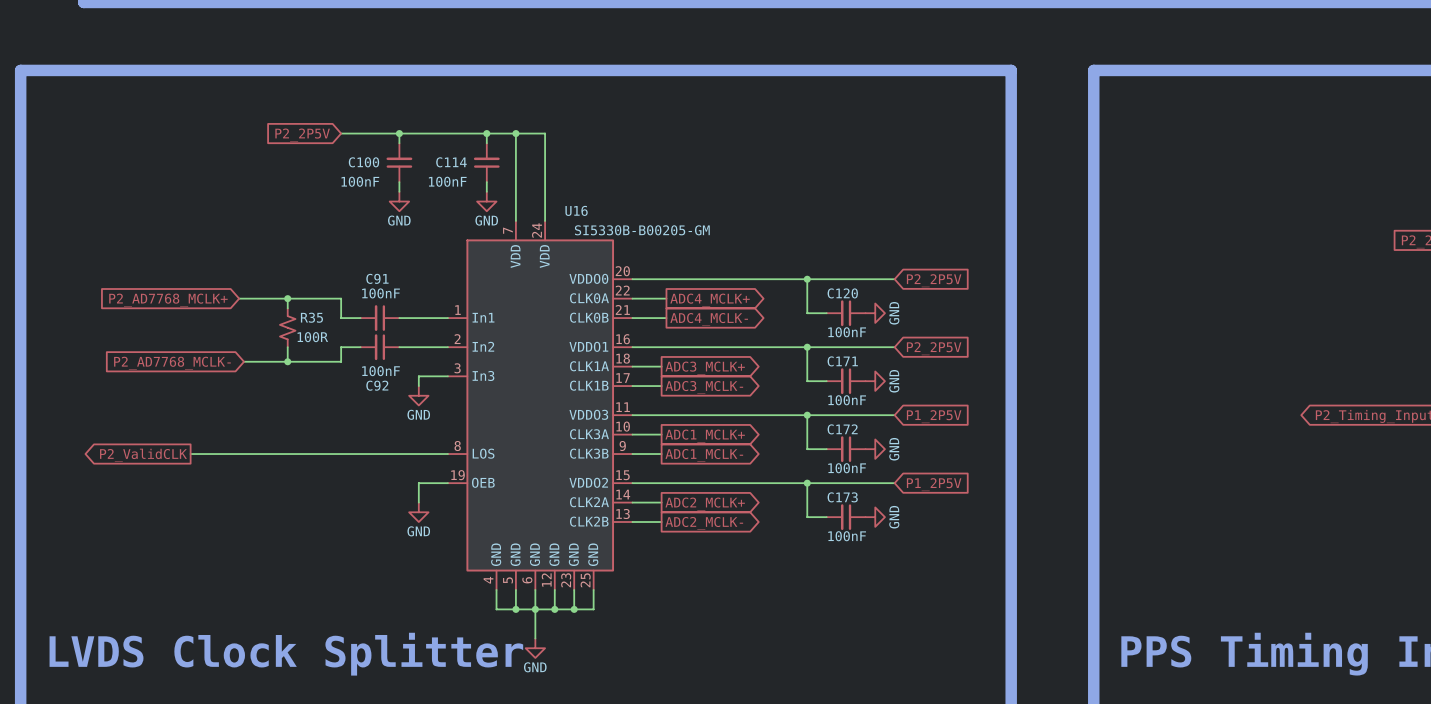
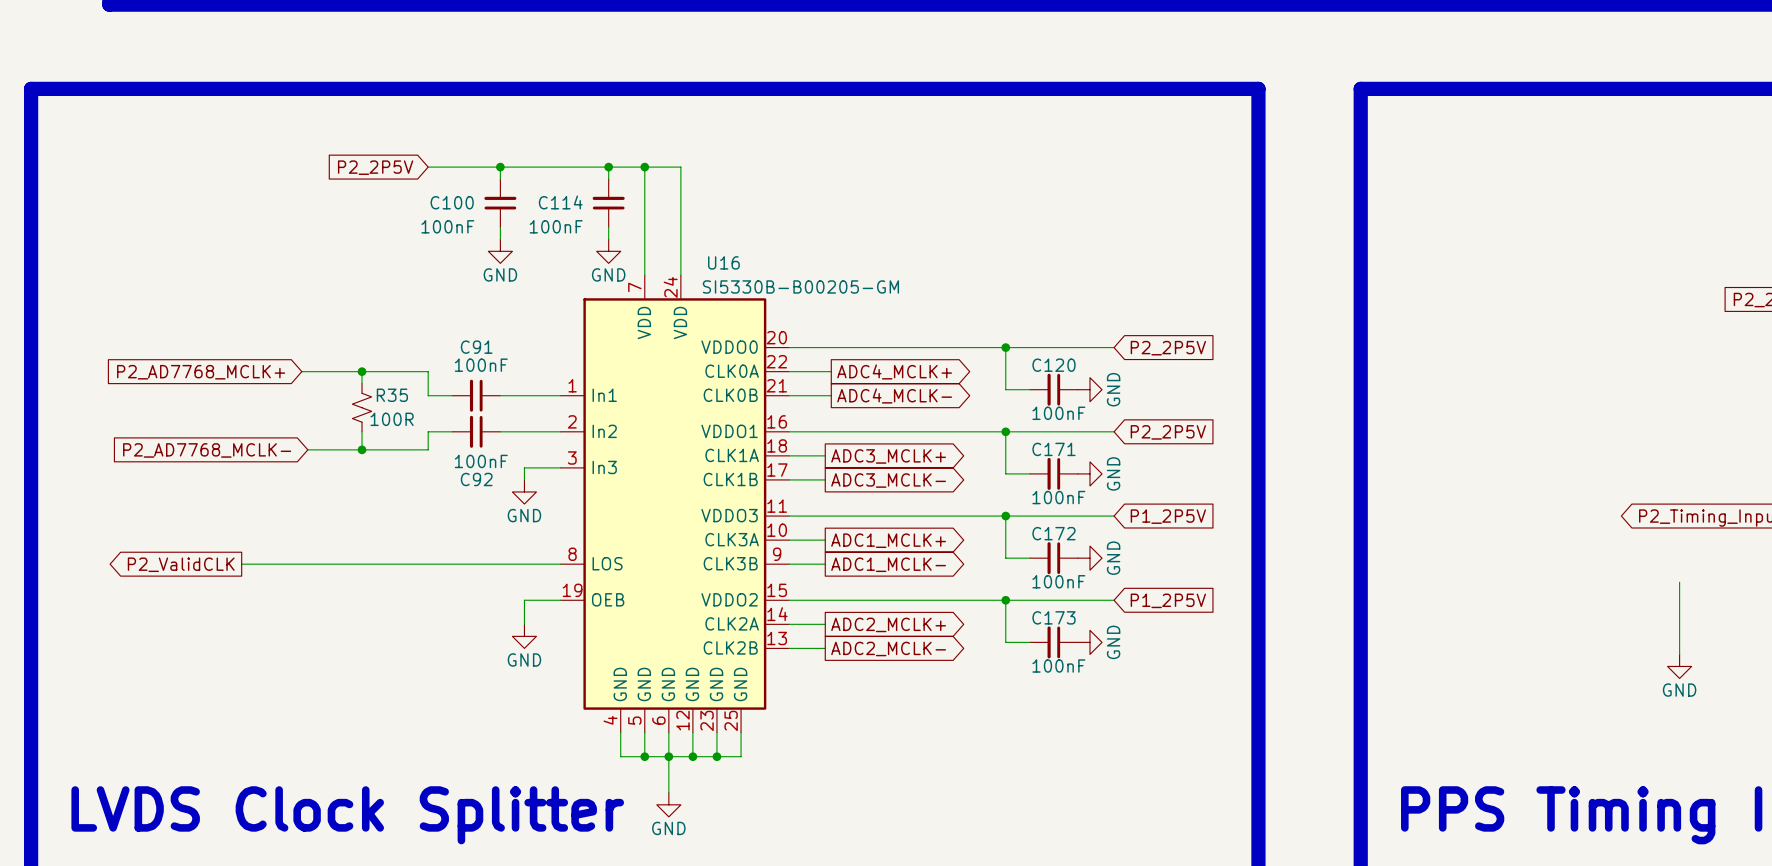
wire: none -> (1679, 582) (1679, 654)
power symbol: none -> GND (1679, 666)

